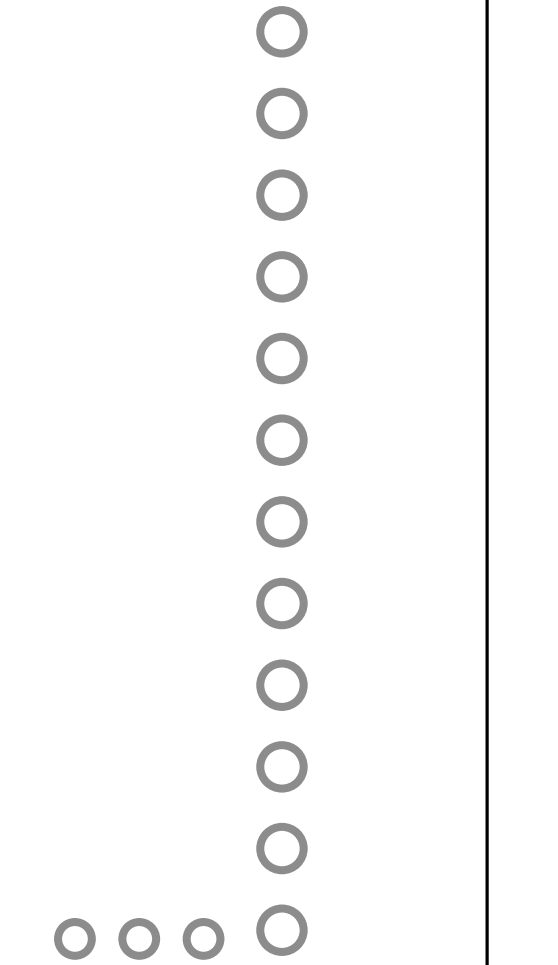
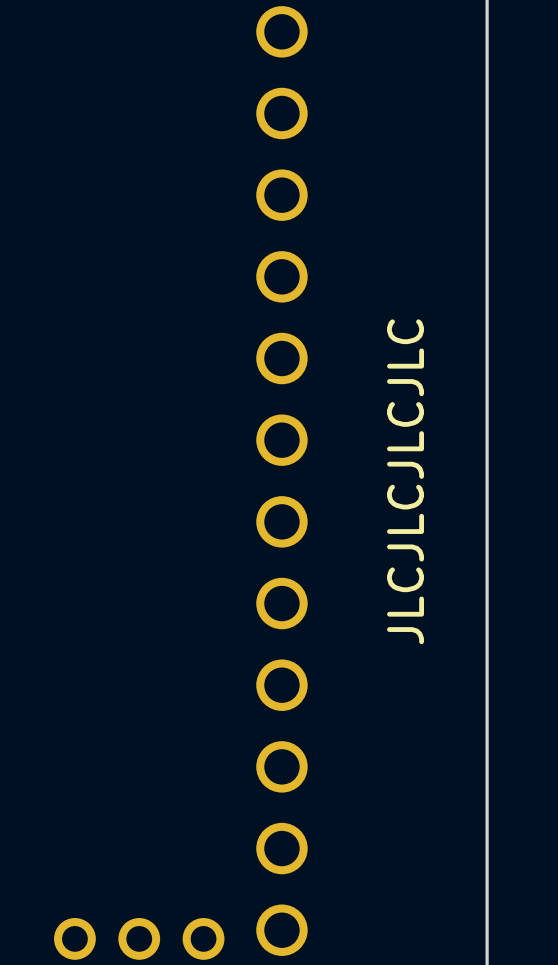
text: none -> JLCJLCJLCJLC (405, 481)

